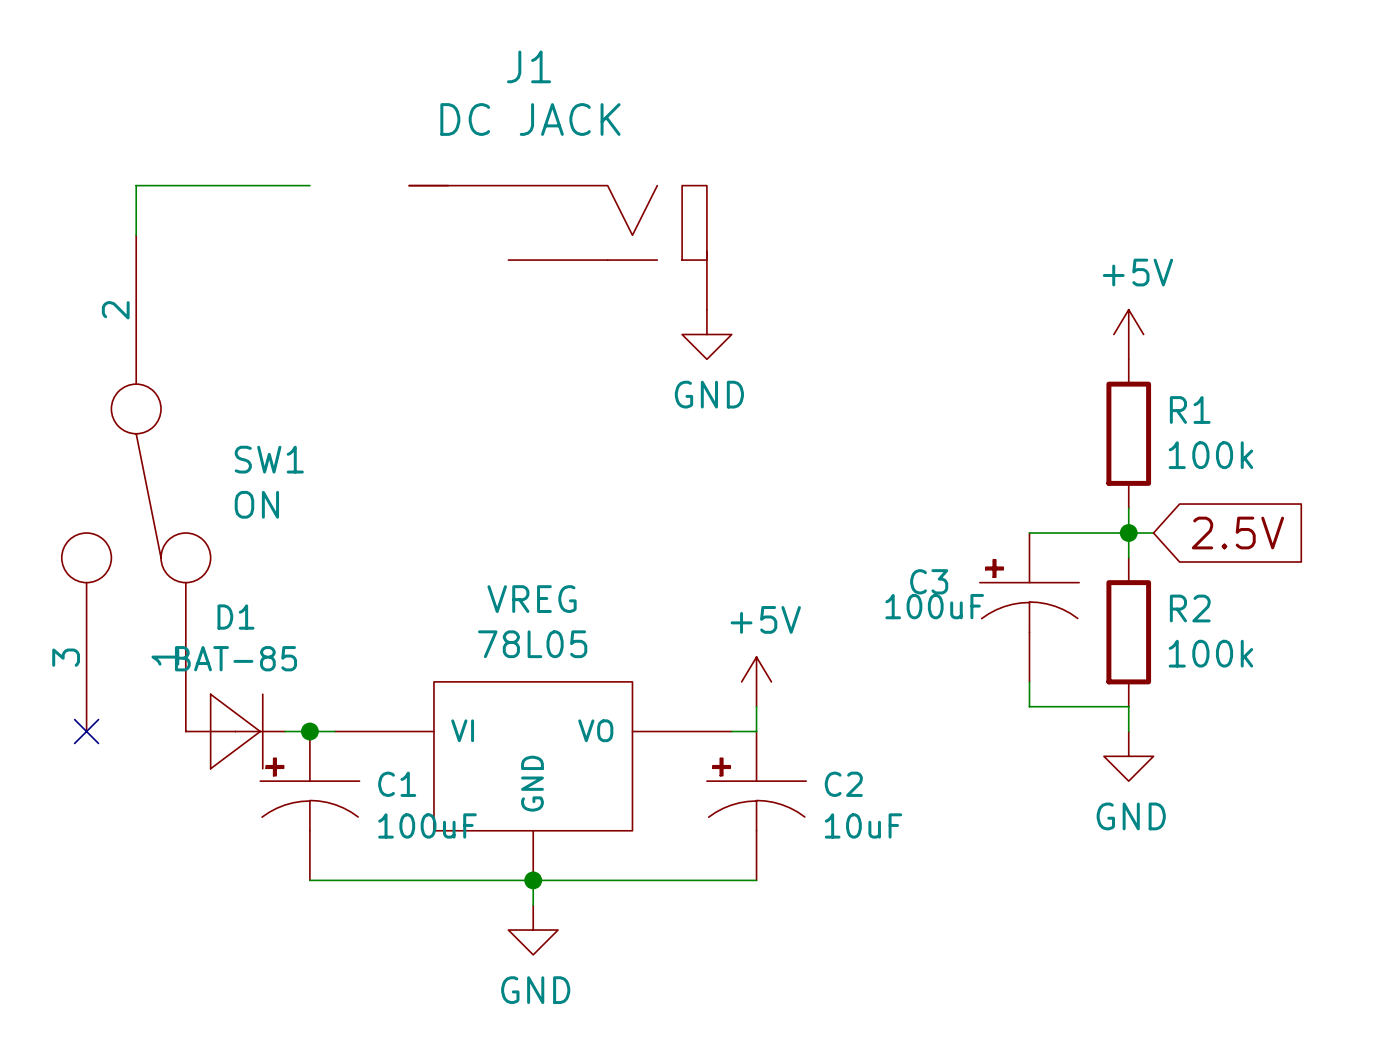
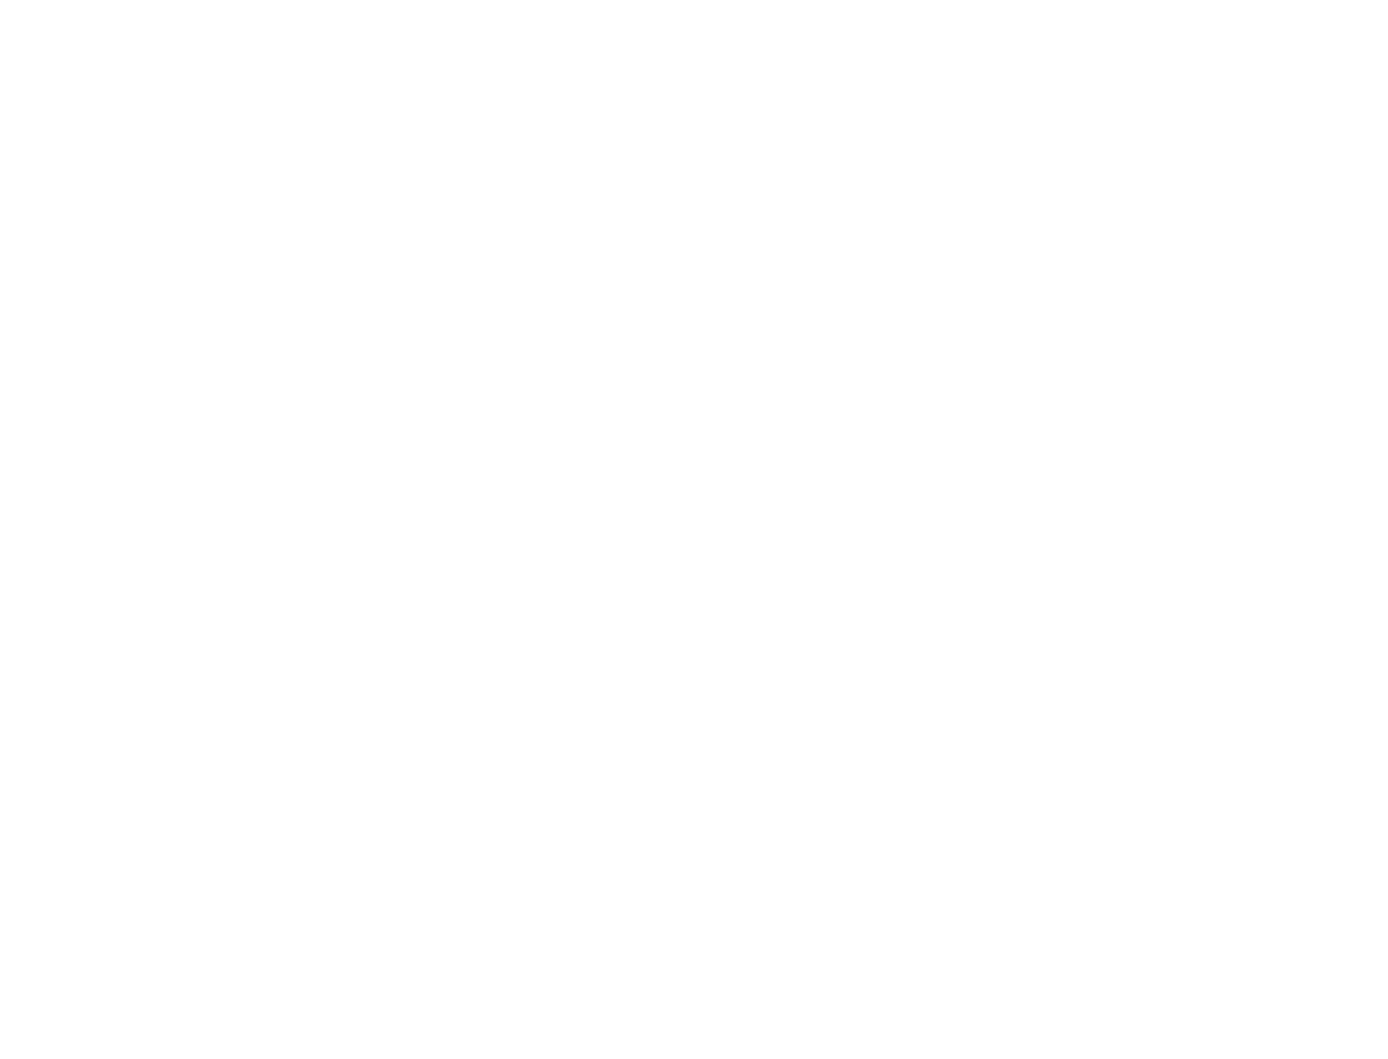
wire: (309, 185) (136, 185) (136, 235) -> none
J1: DC JACK (558, 247) -> none
power symbol: GND (706, 334) -> none
power symbol: +5V (1128, 334) -> none
R1: 100k (1128, 433) -> none
SW1: ON (136, 483) -> none
wire: (1128, 508) (1128, 557) -> none
wire: (1029, 533) (1153, 533) -> none
junction: (1128, 533) -> none
global label: 2.5V (1237, 533) -> none
C3: 100uF (1029, 607) -> none
R2: 100k (1128, 632) -> none
power symbol: +5V (756, 681) -> none
wire: (1029, 681) (1029, 706) (1128, 706) (1128, 731) -> none
wire: (756, 706) (756, 731) (731, 731) -> none
no-connect mark: (86, 731) -> none
D1: BAT-85 (235, 731) -> none
wire: (285, 731) (334, 731) -> none
junction: (309, 731) -> none
power symbol: GND (1128, 756) -> none
VREG: 78L05 (533, 781) -> none
C1: 100uF (309, 805) -> none
C2: 10uF (756, 805) -> none
wire: (309, 880) (756, 880) -> none
wire: (533, 880) (533, 905) -> none
junction: (533, 880) -> none
power symbol: GND (533, 930) -> none

